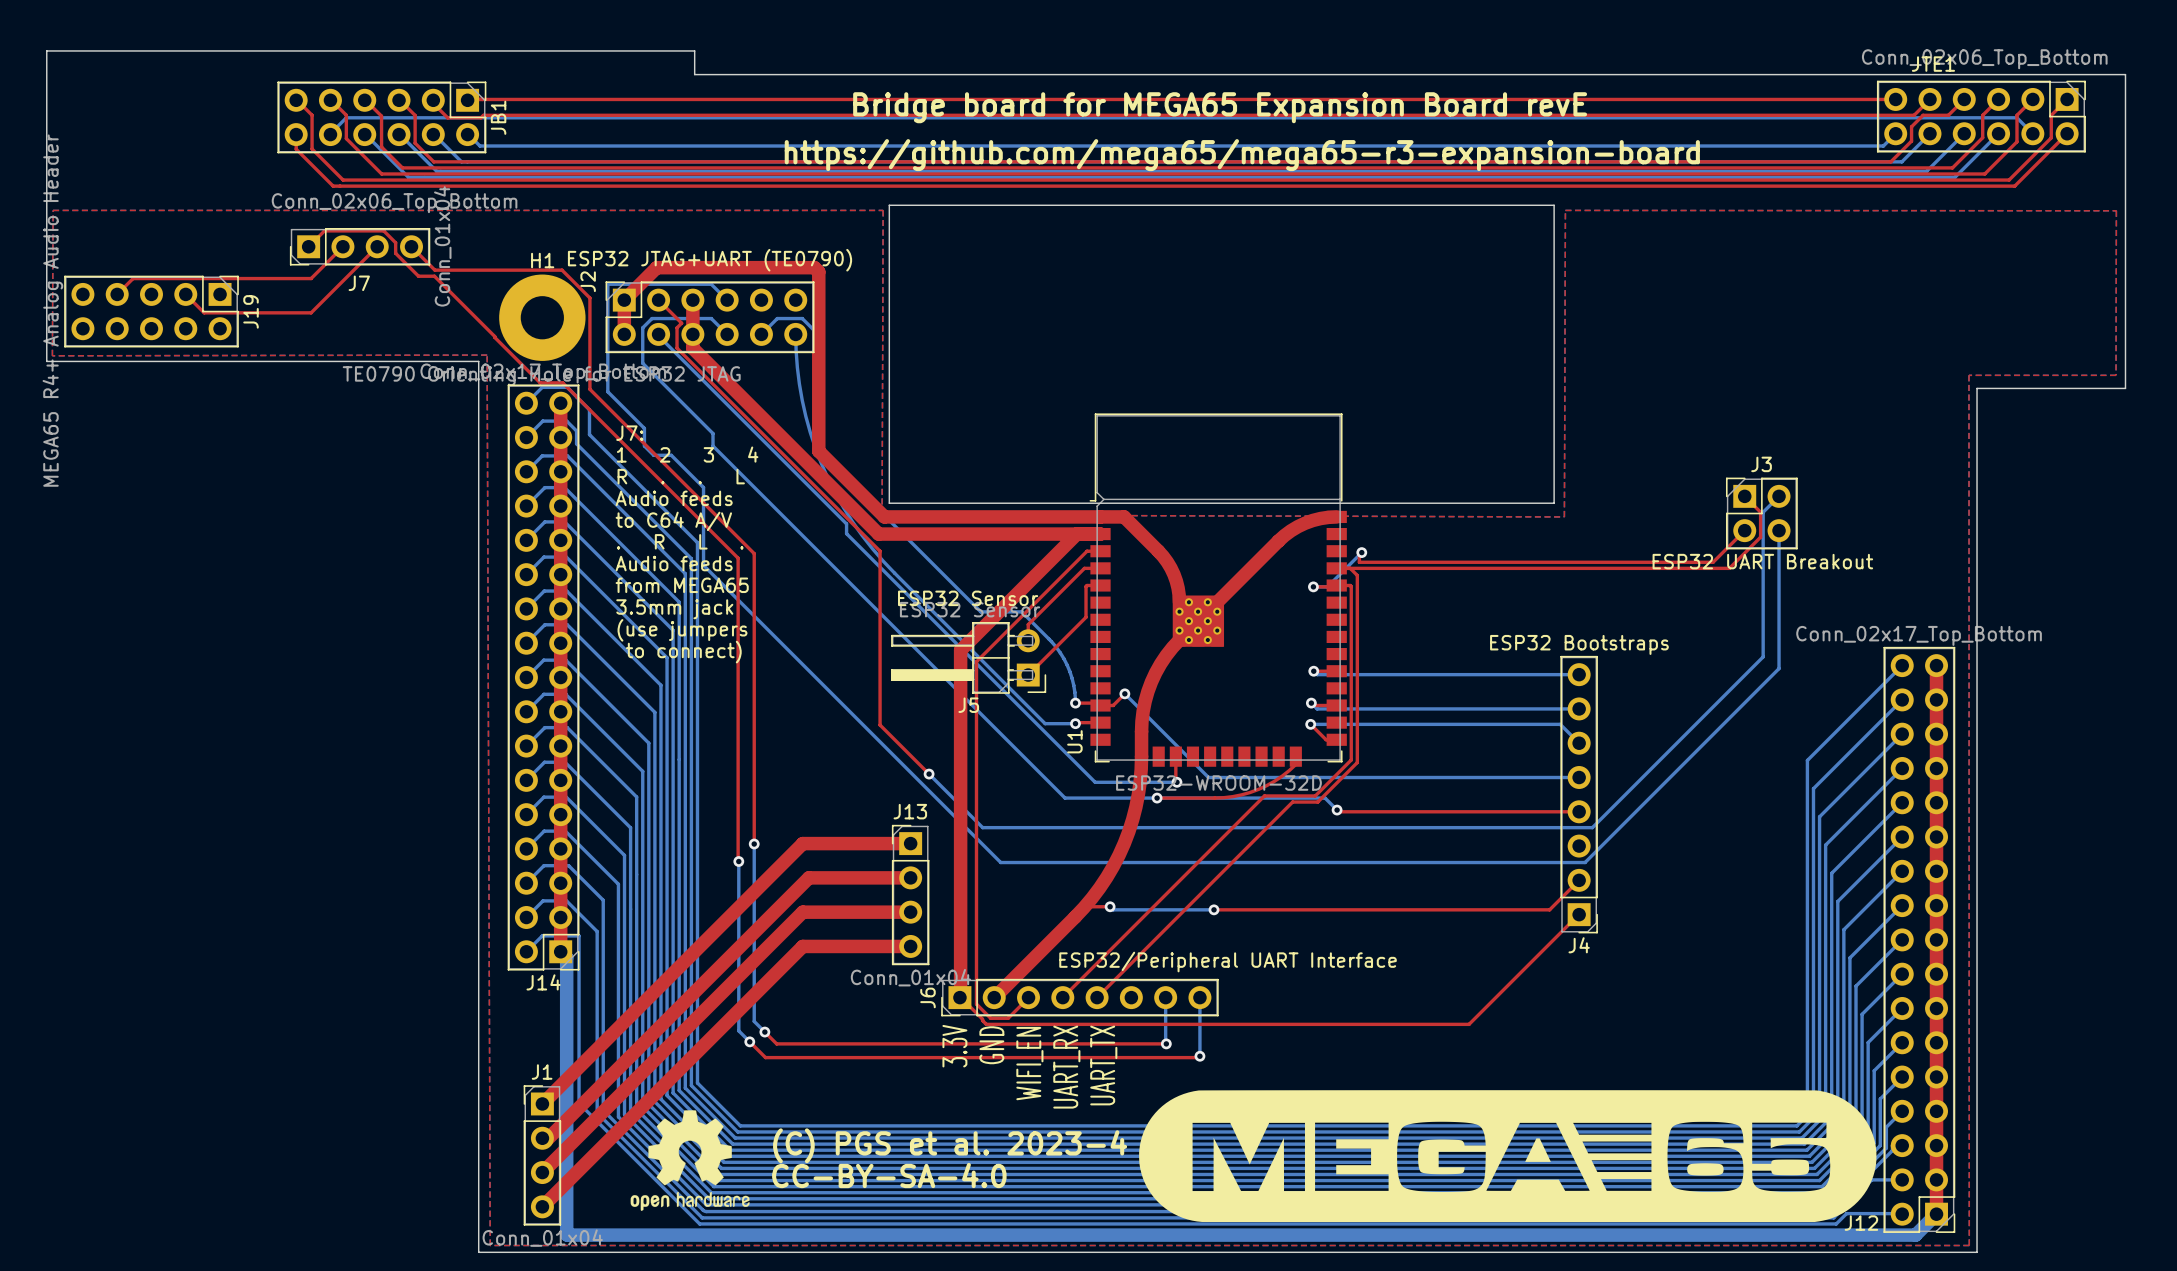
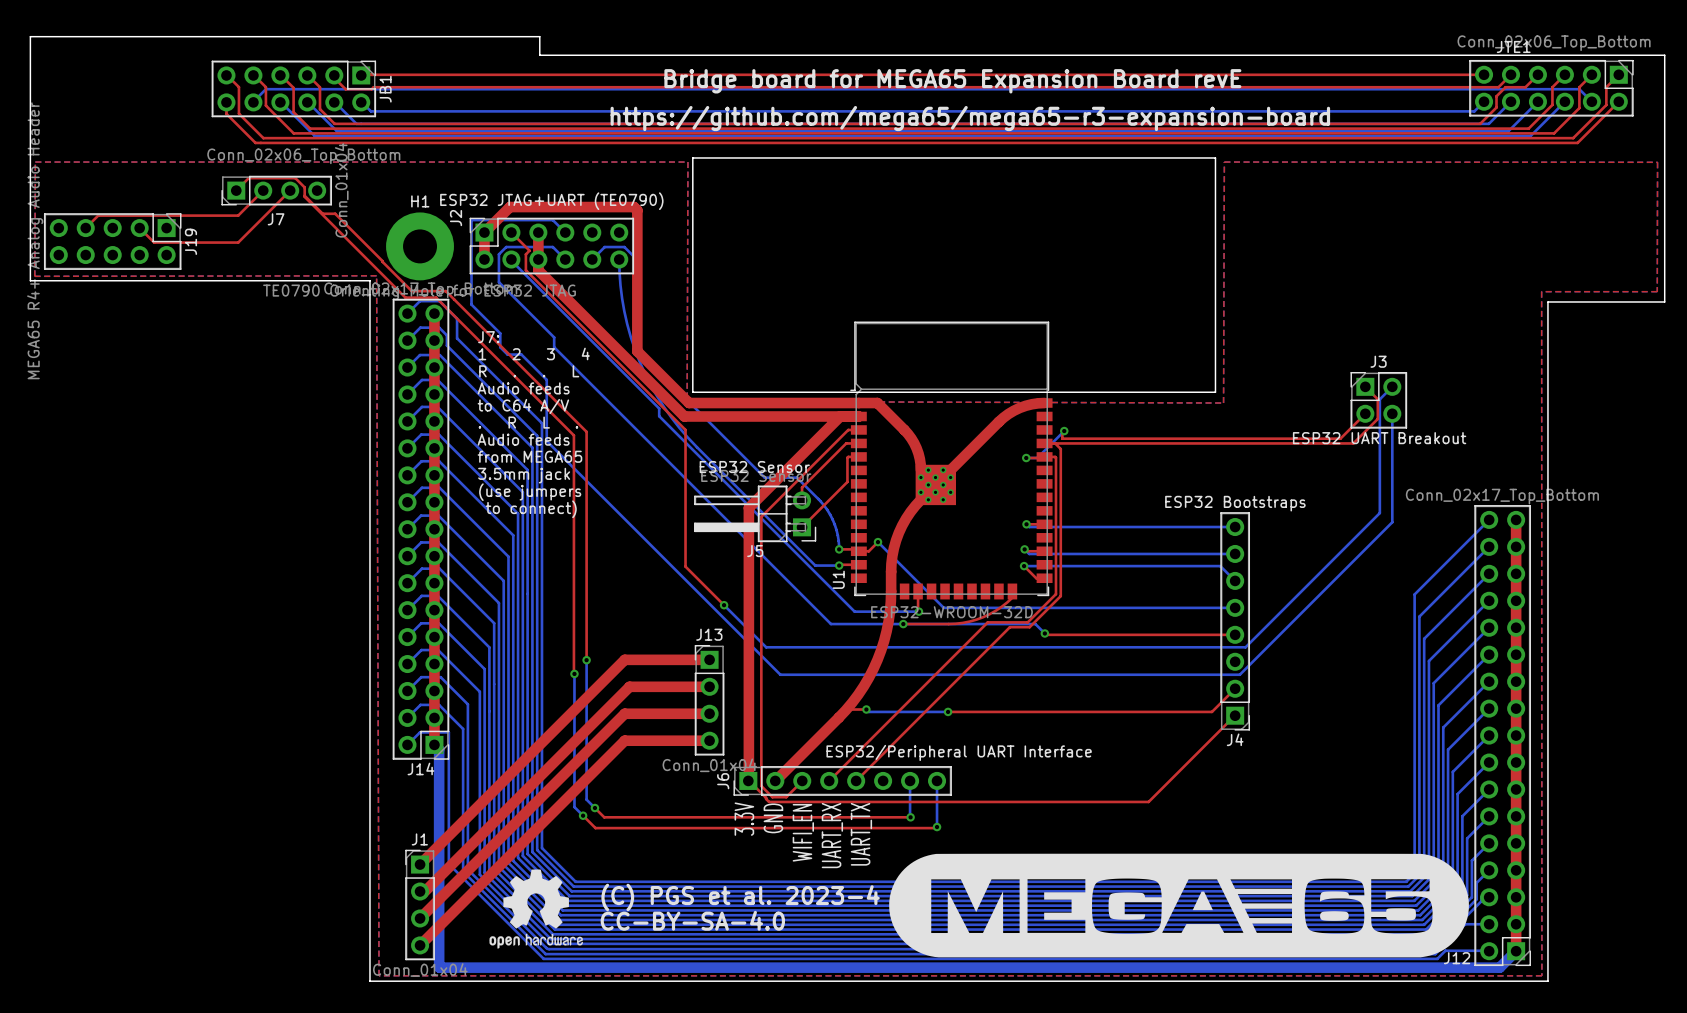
top track: (411, 246) (434, 270) (562, 270) (589, 298) (589, 389) -> none
top track: none -> (304, 195) (405, 297) (418, 297)
top track: (531, 374) (540, 382) -> (411, 291) (445, 291) (457, 302)

